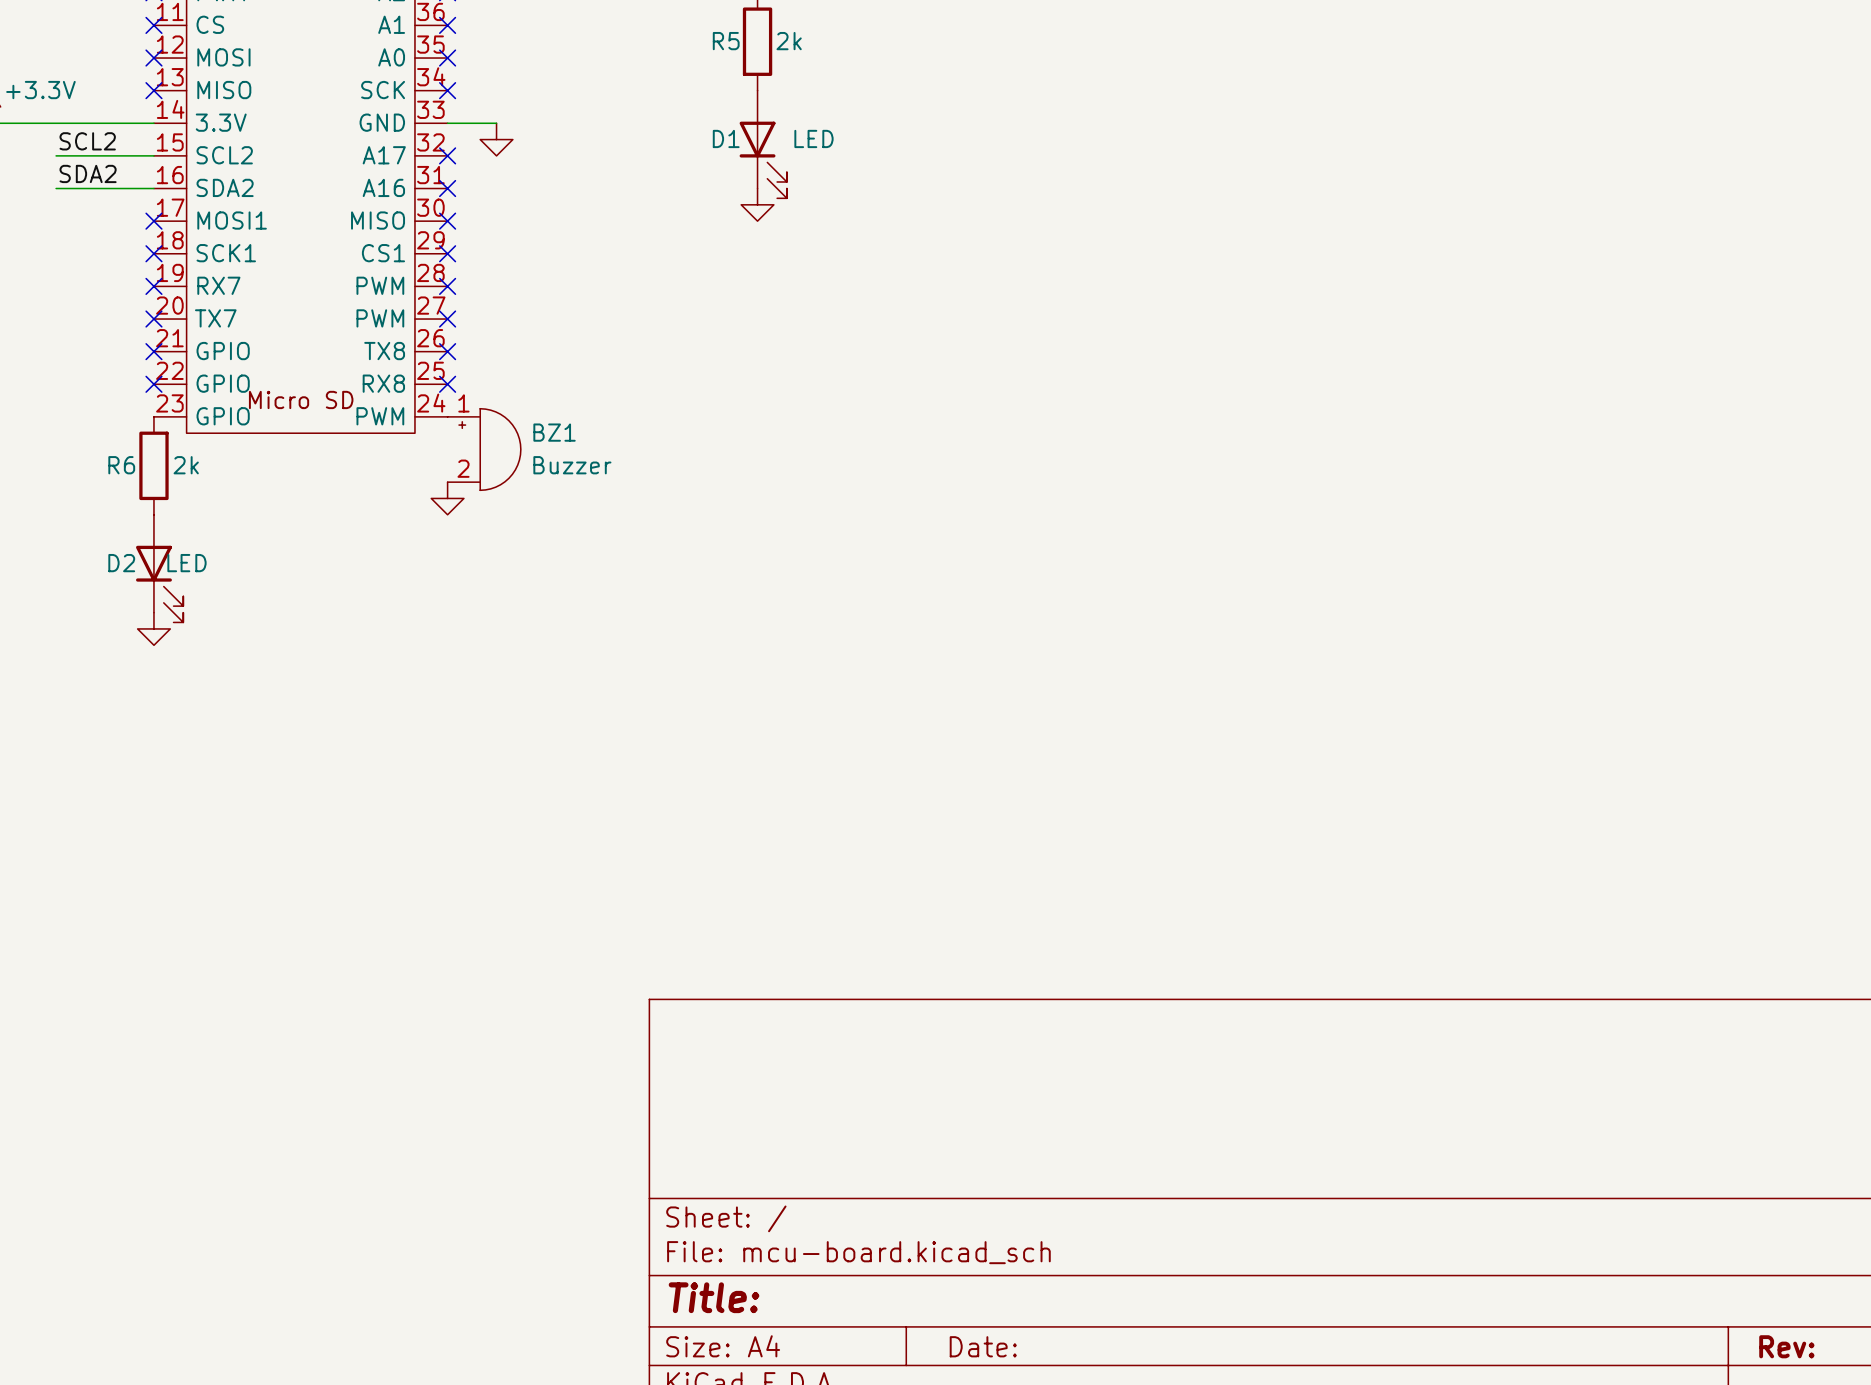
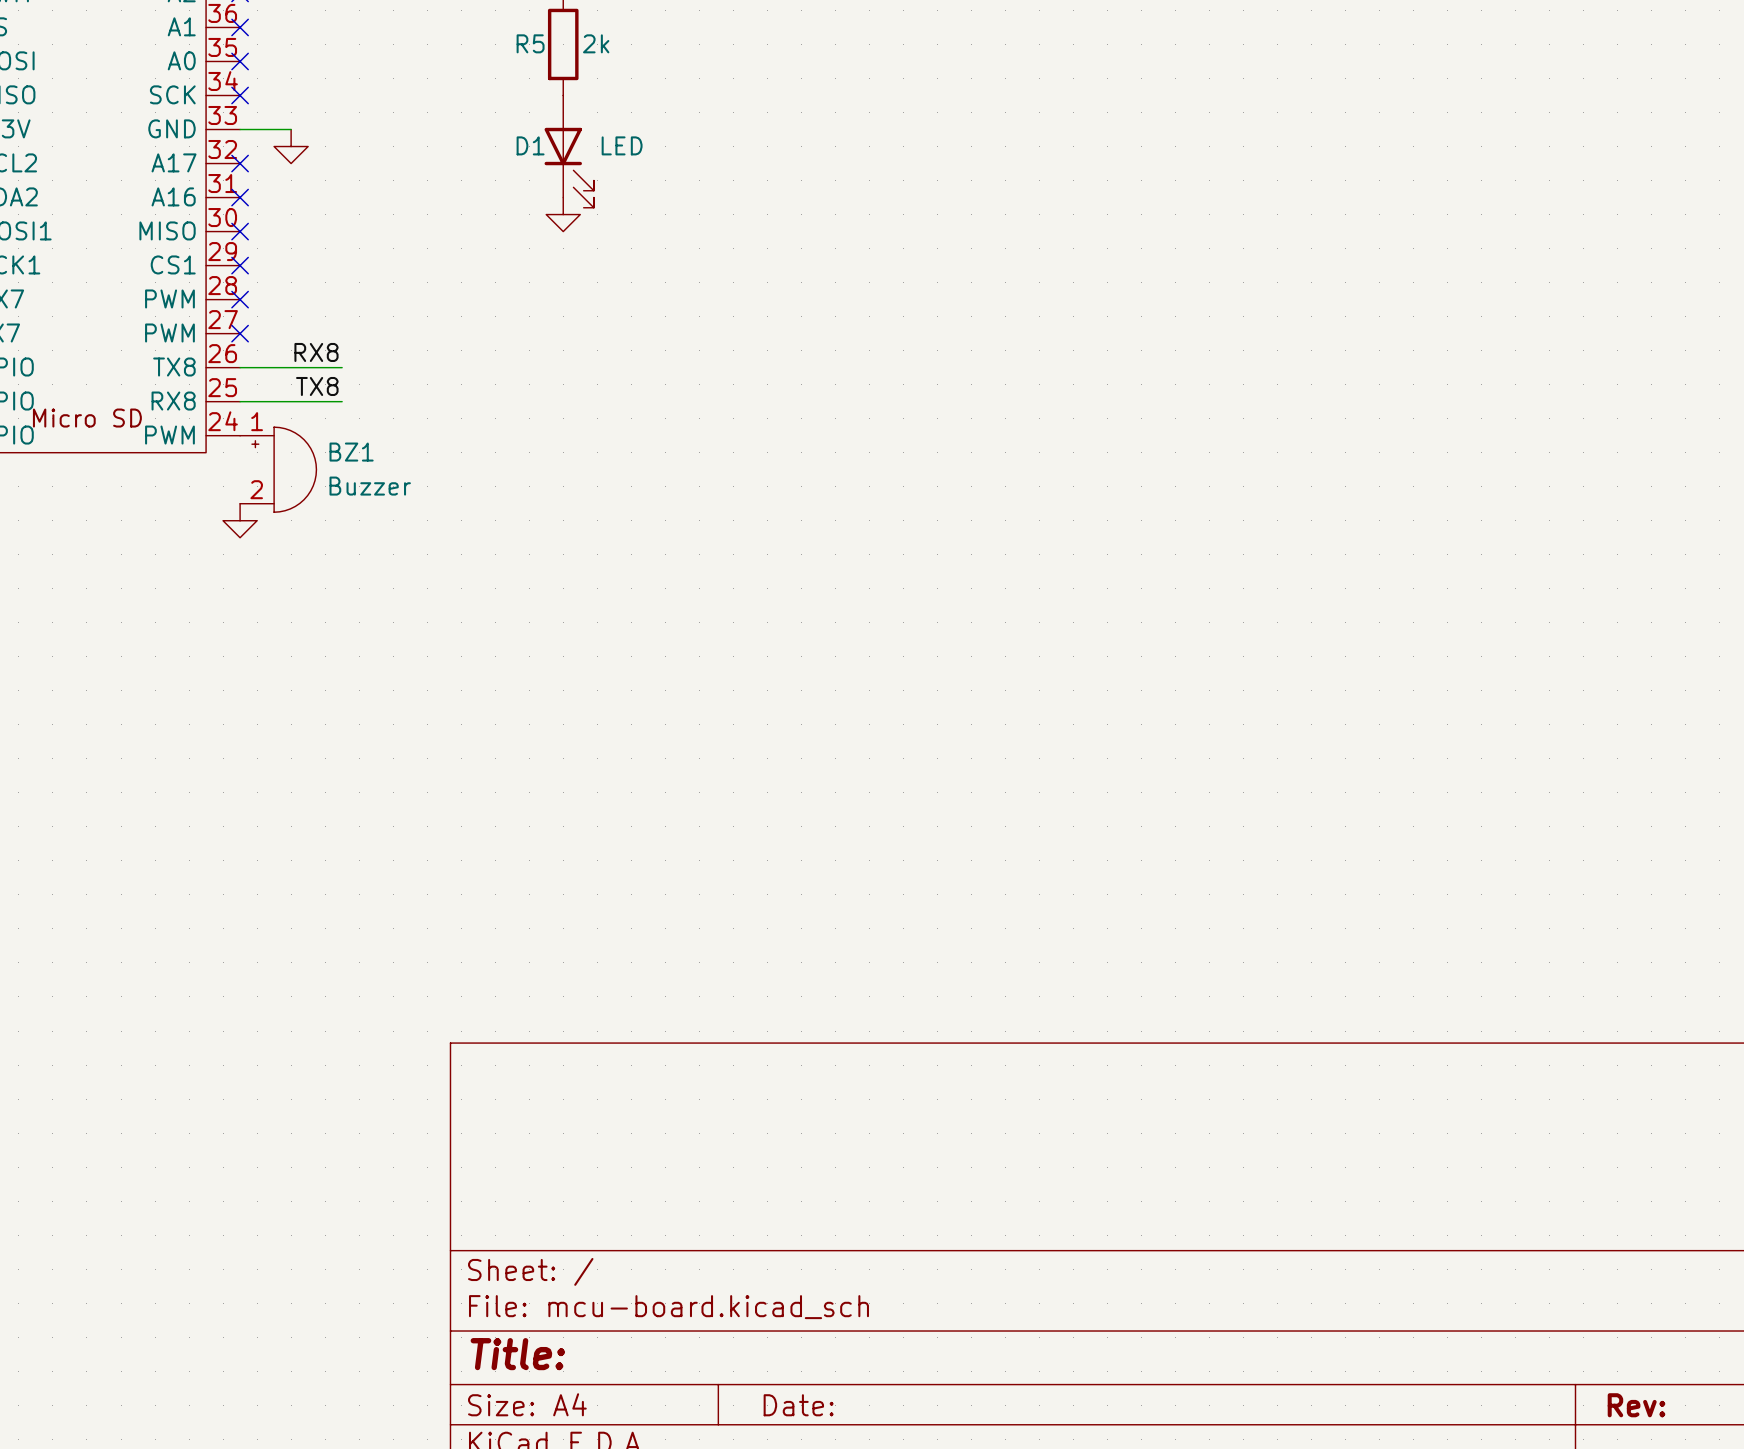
label: none -> RX8 (316, 352)
wire: none -> (240, 367) (342, 367)
no-connect mark: (447, 351) -> none
label: none -> TX8 (317, 386)
wire: none -> (240, 401) (342, 401)
no-connect mark: (447, 384) -> none

